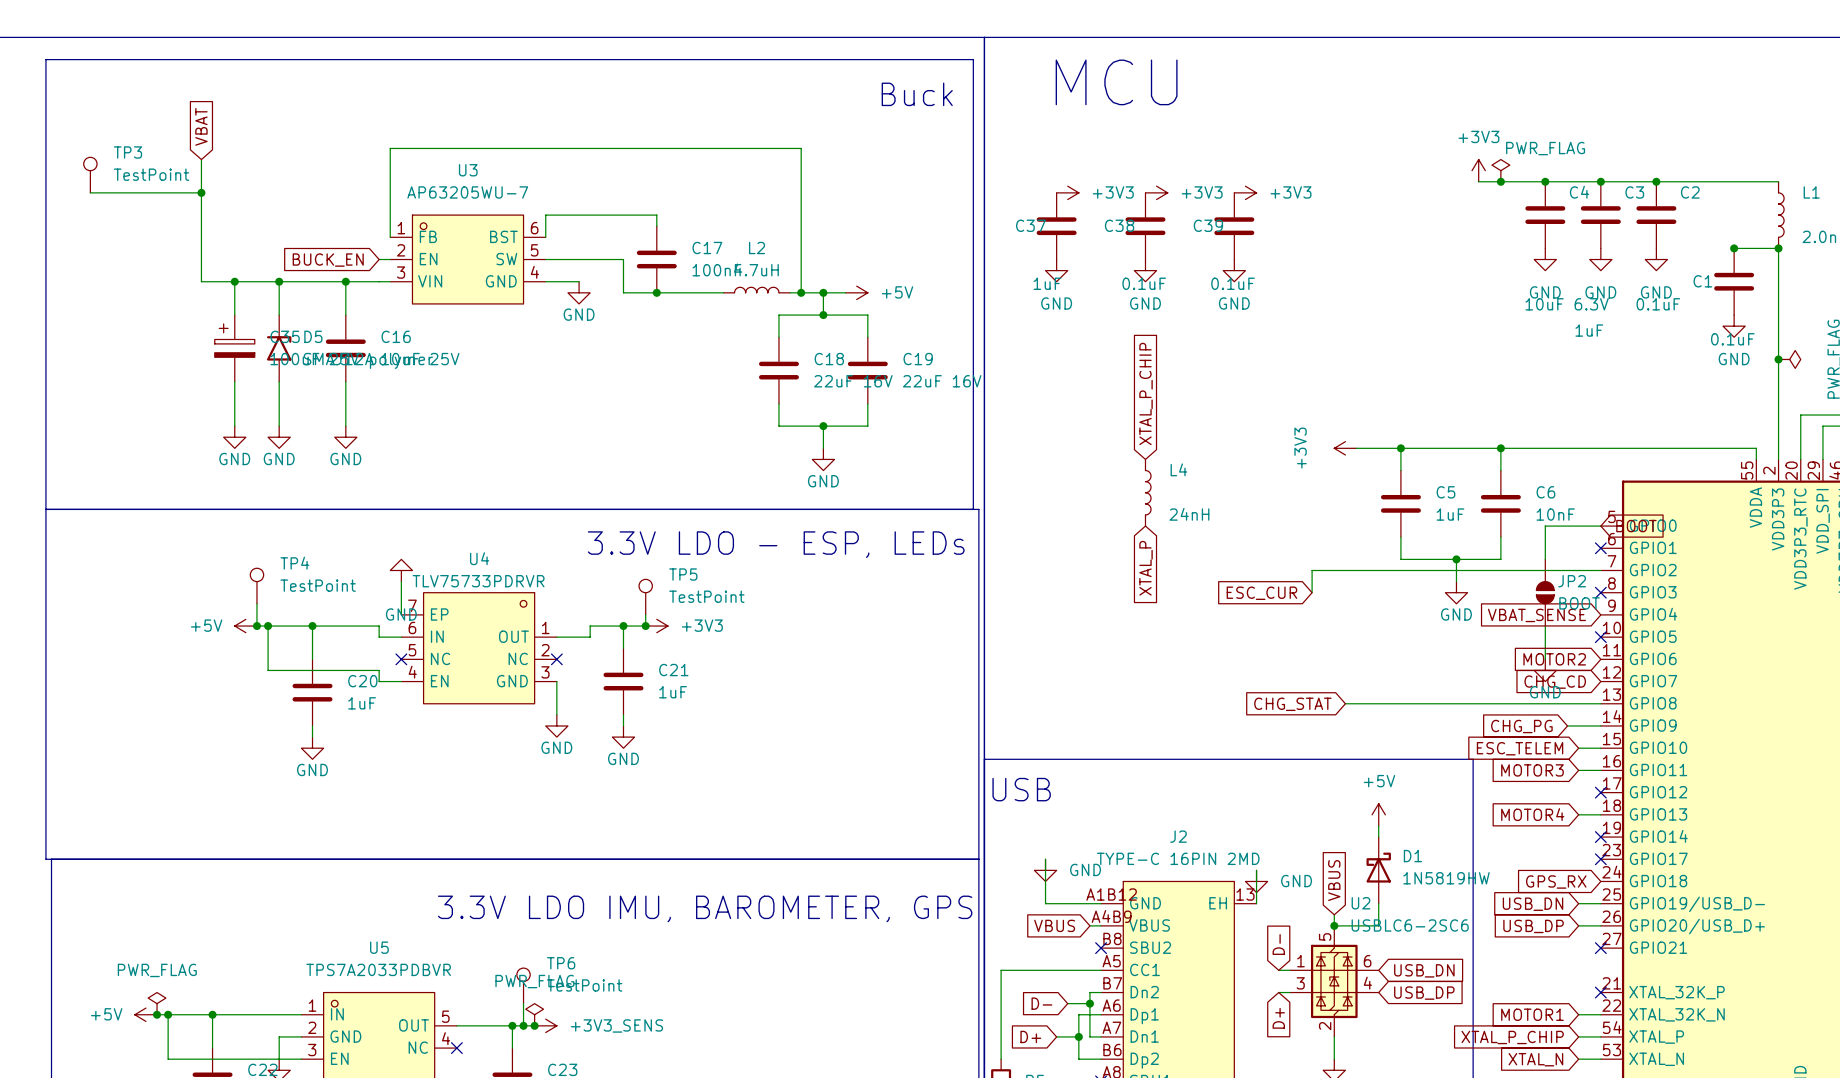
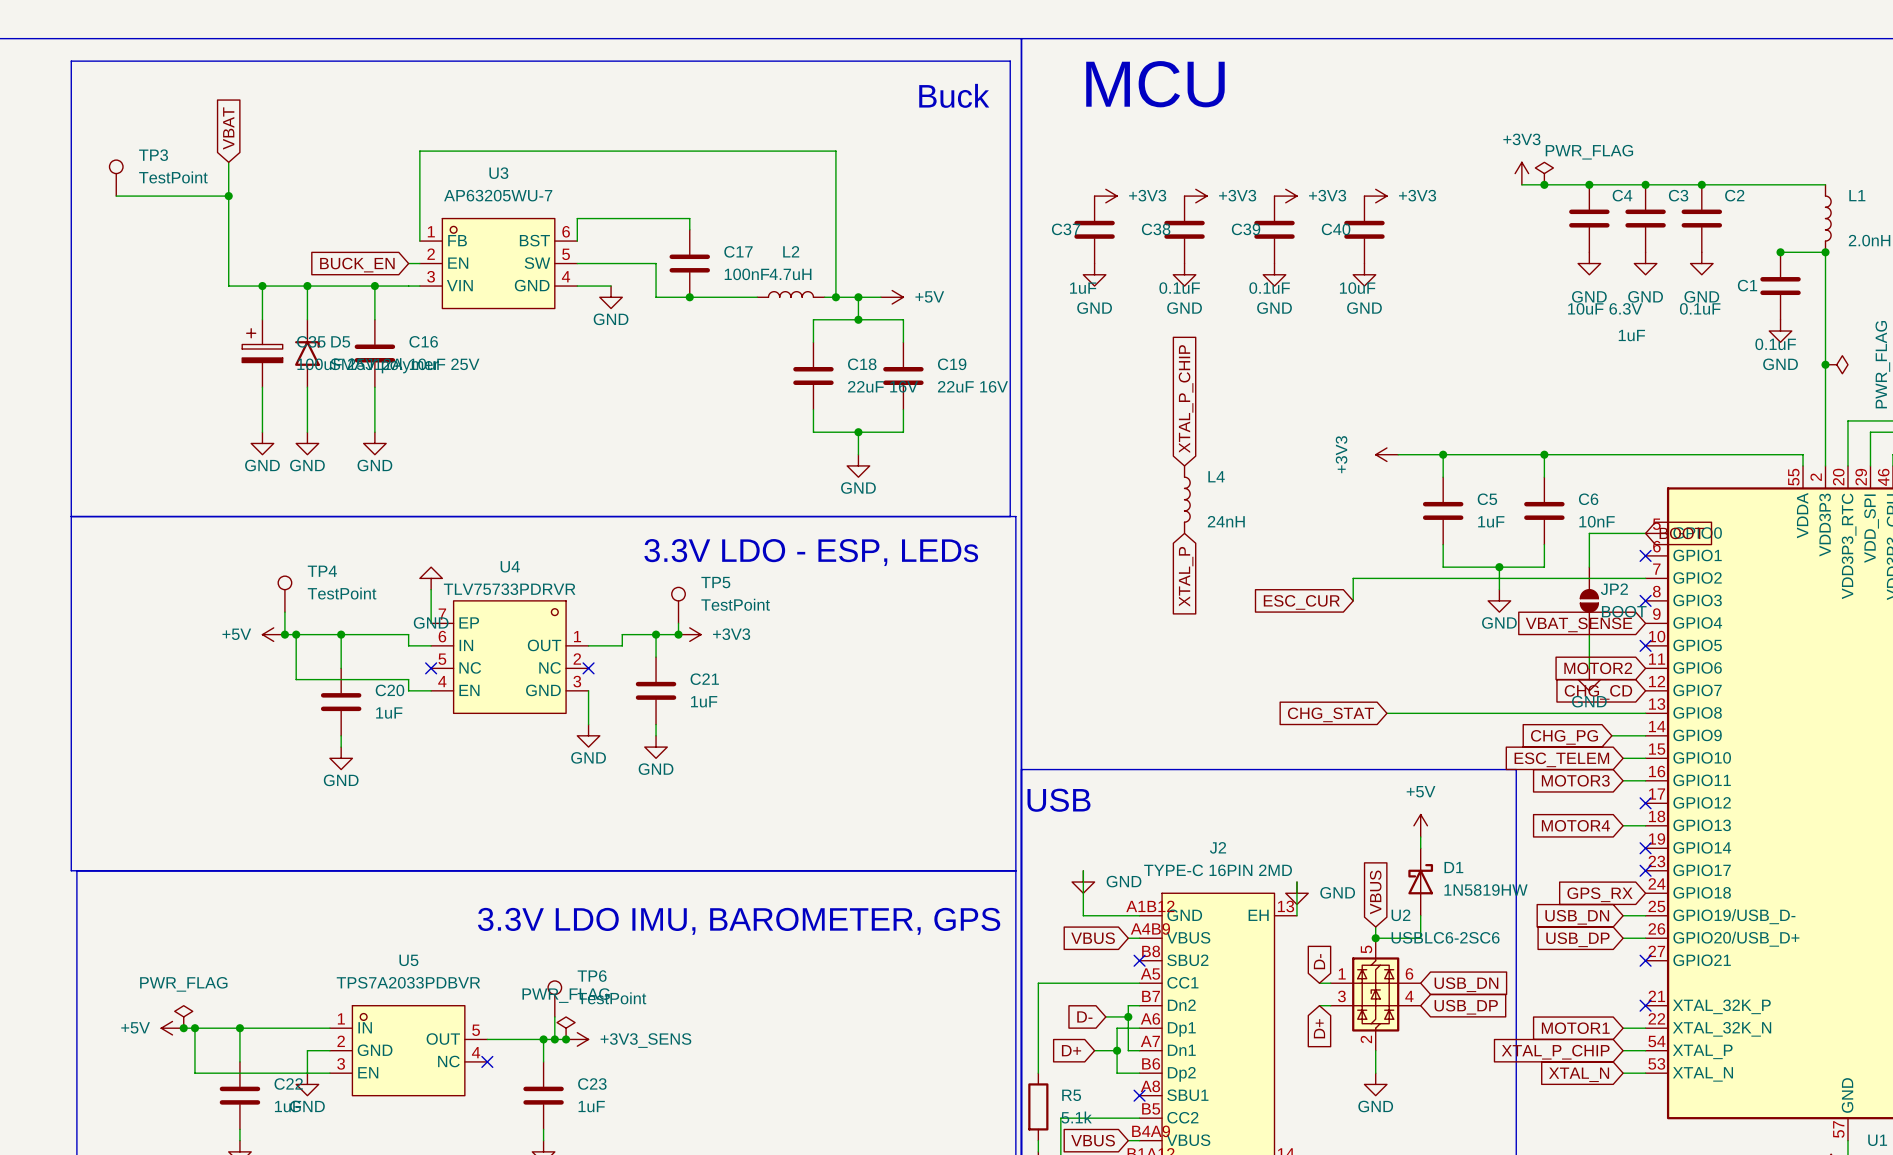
power symbol: none -> +3V3 (1375, 196)
C40: none -> 10uF (1364, 229)
power symbol: none -> GND (1364, 274)

